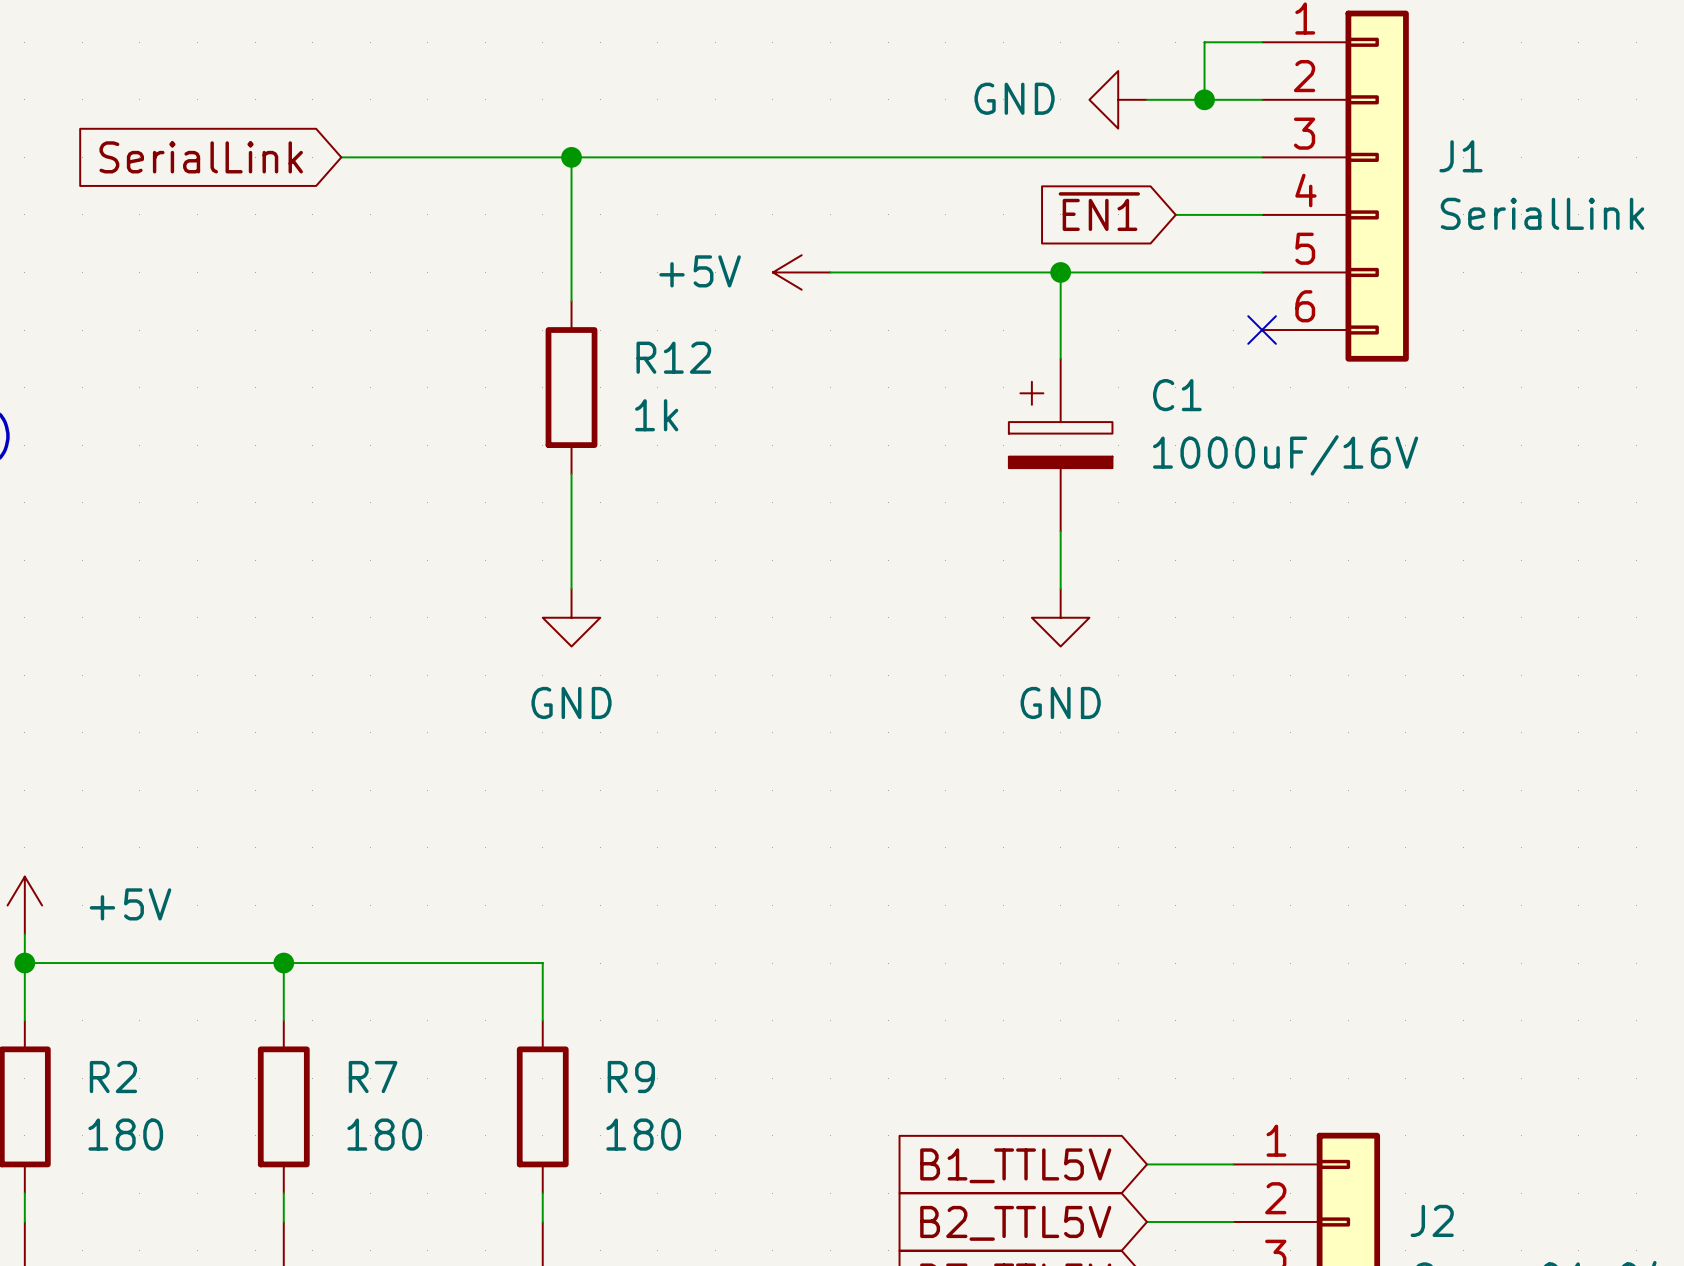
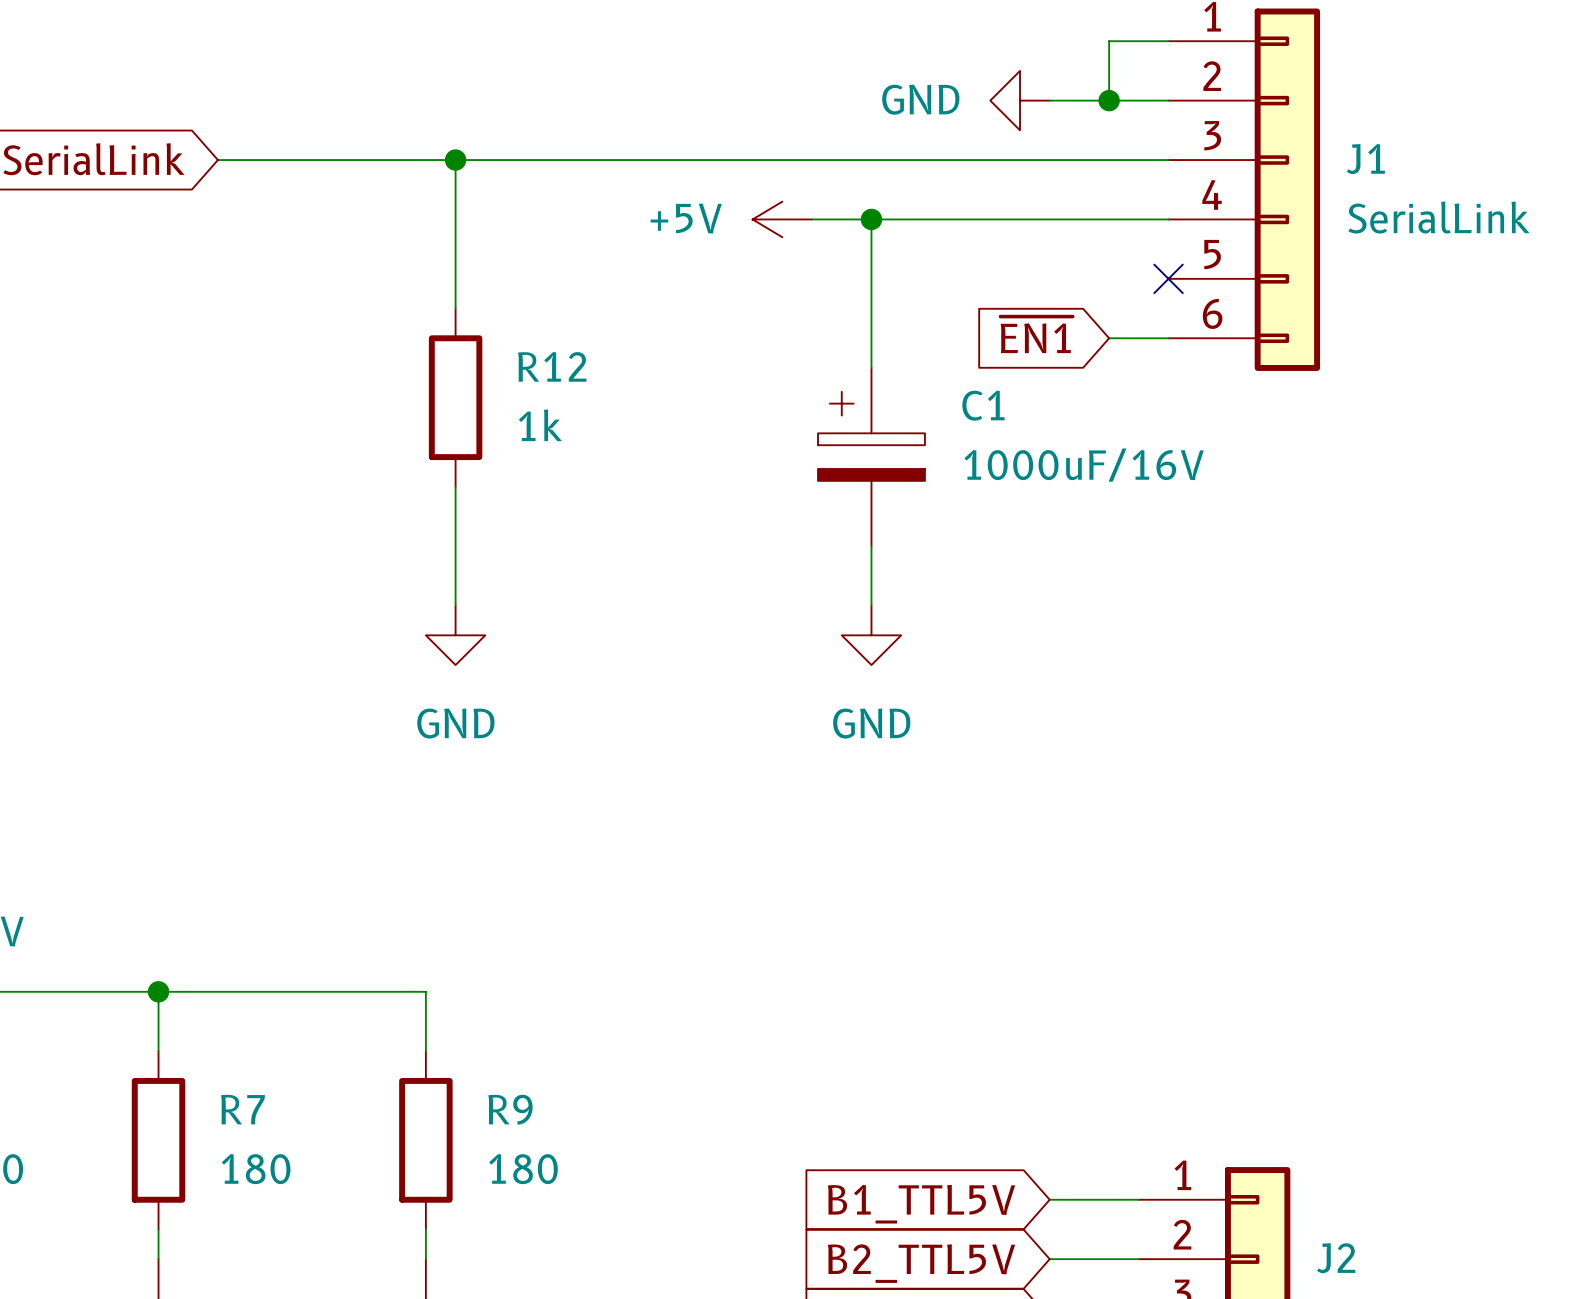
global label position: ~{EN1} (1099, 211) -> ~{EN1} (1036, 334)
wire: none -> (812, 219) (1079, 219)
wire: none -> (871, 219) (871, 367)
power symbol position: +5V (801, 272) -> +5V (782, 219)
wire: (830, 272) (1262, 272) -> none
wire: (1060, 272) (1060, 358) -> none
junction position: (1060, 272) -> (871, 219)
wire: none -> (1109, 338) (1168, 338)
no-connect mark position: (1262, 330) -> (1168, 278)
C1 position: (1060, 445) -> (871, 457)
wire: (1060, 531) (1060, 588) -> (871, 546) (871, 605)
power symbol position: GND (1060, 617) -> GND (871, 635)

